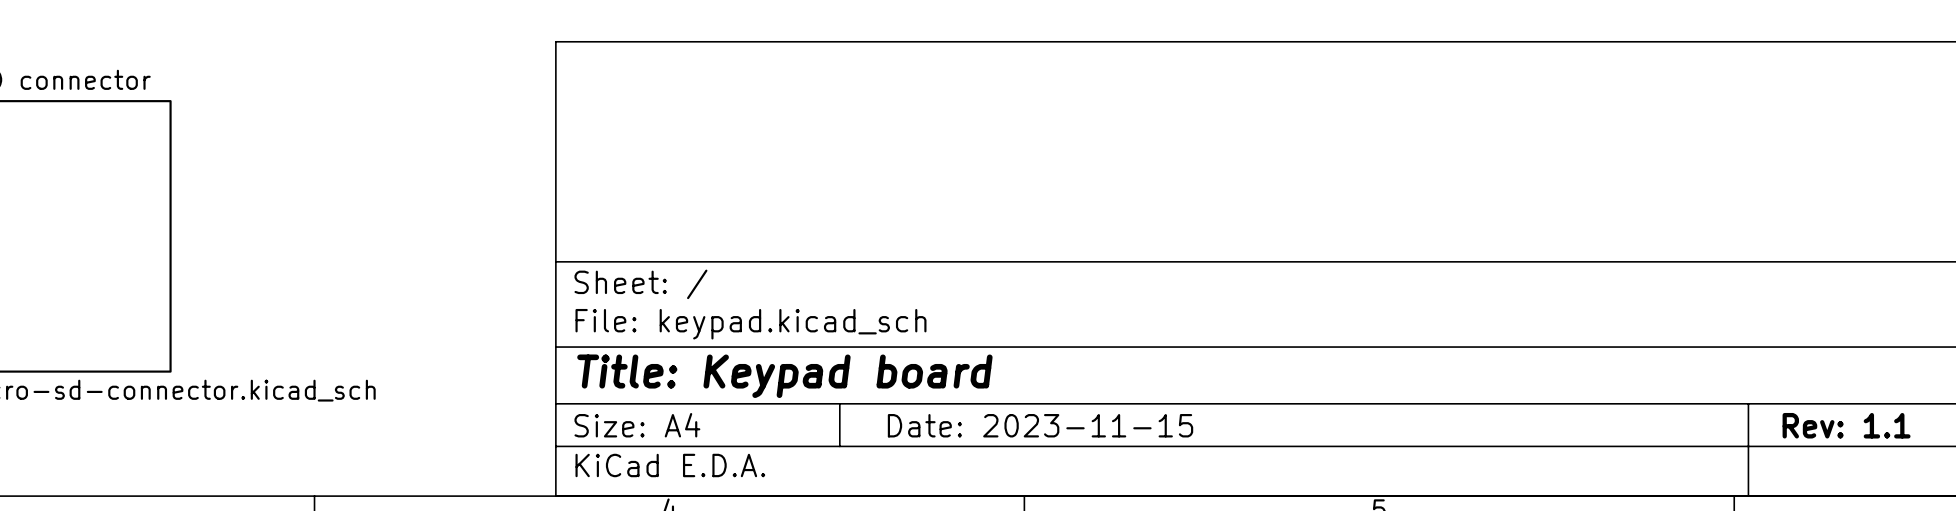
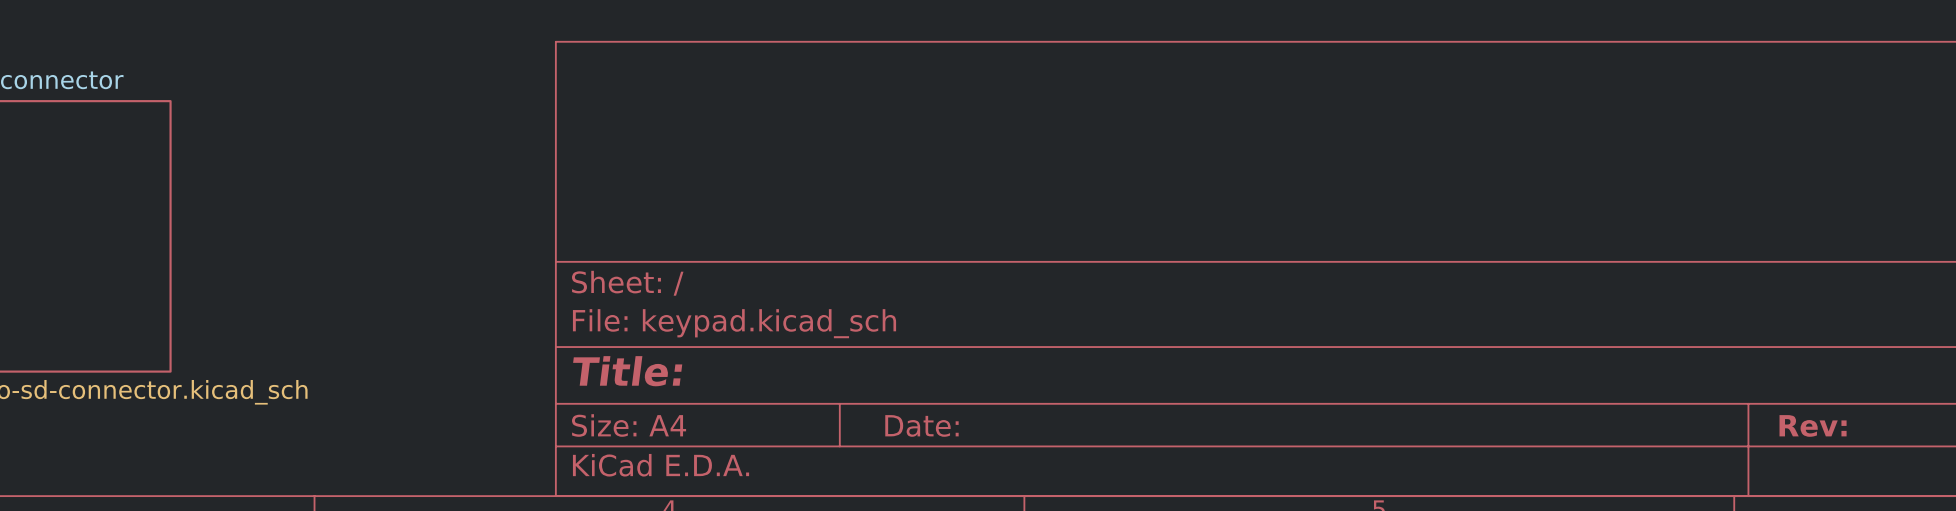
title block: Title: Keypad board (784, 376) -> Title: (627, 371)
title block: Date: 2023-11-15 (1040, 425) -> Date: (921, 425)
title block: Rev: 1.1 (1846, 425) -> Rev: (1813, 425)

